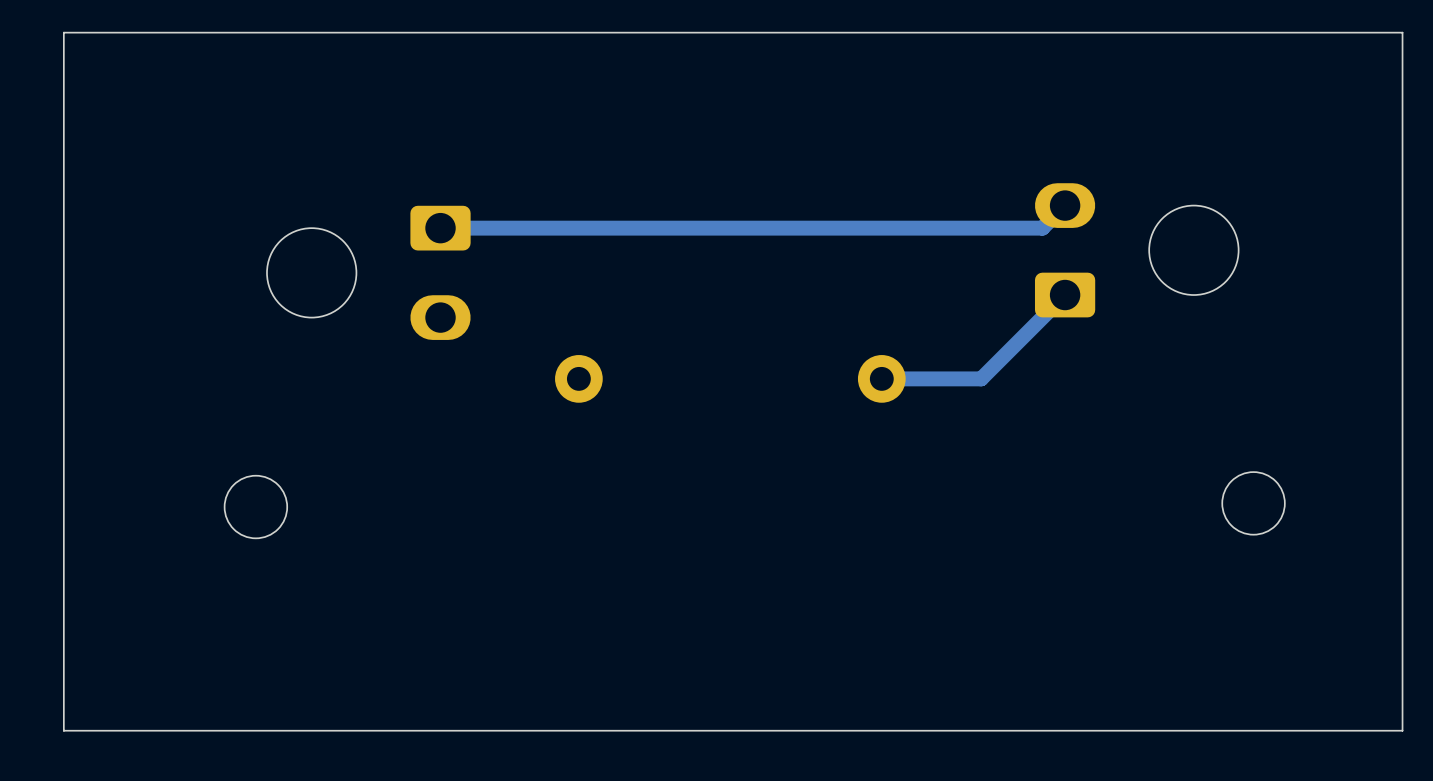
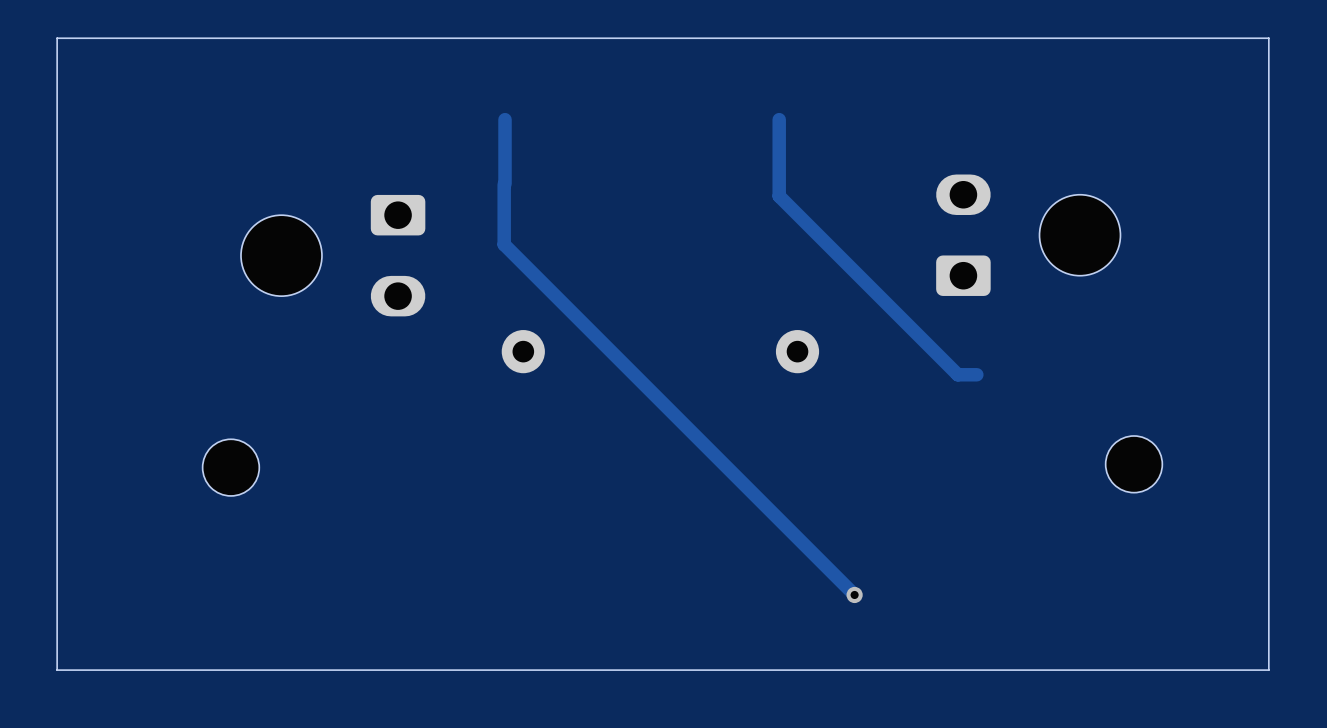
track: none -> (505, 119) (505, 183)
track: none -> (779, 119) (779, 196) (957, 374) (976, 374)
track: none -> (504, 184) (504, 244) (853, 594)
track: (1065, 205) (1042, 228) (440, 228) -> none
track: (1065, 295) (981, 378) (881, 378) -> none
via: none -> (854, 594)

